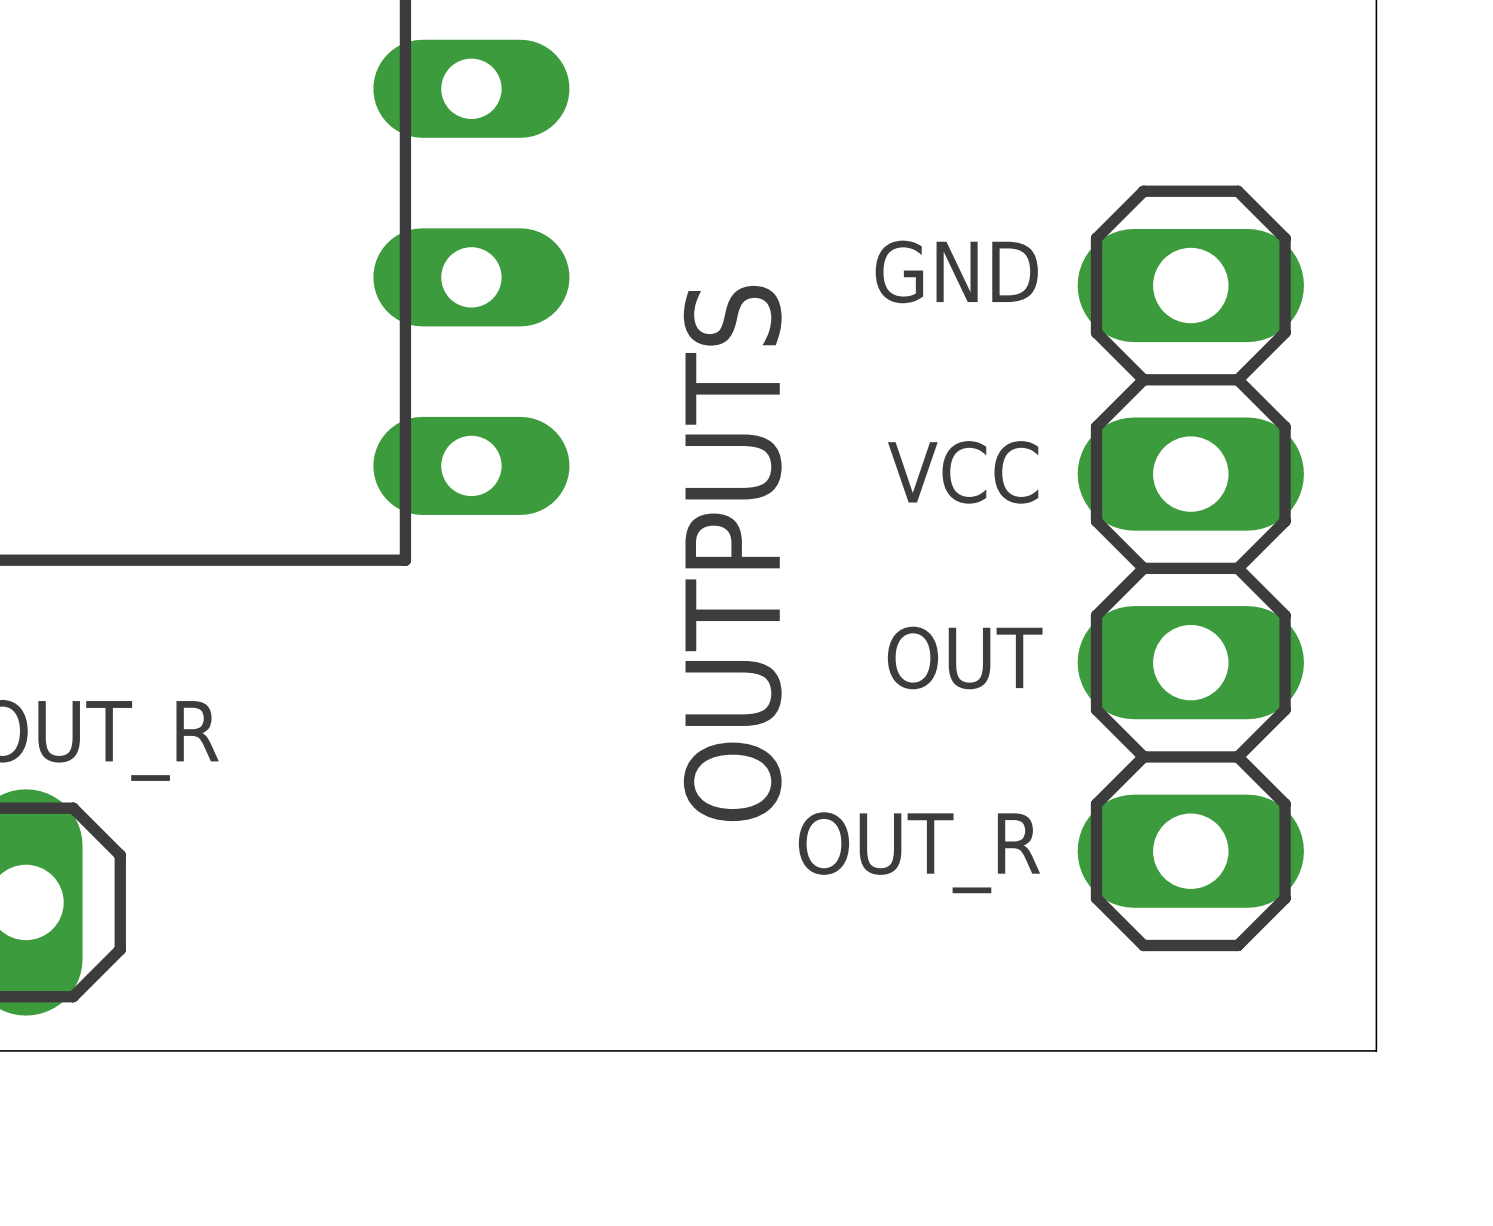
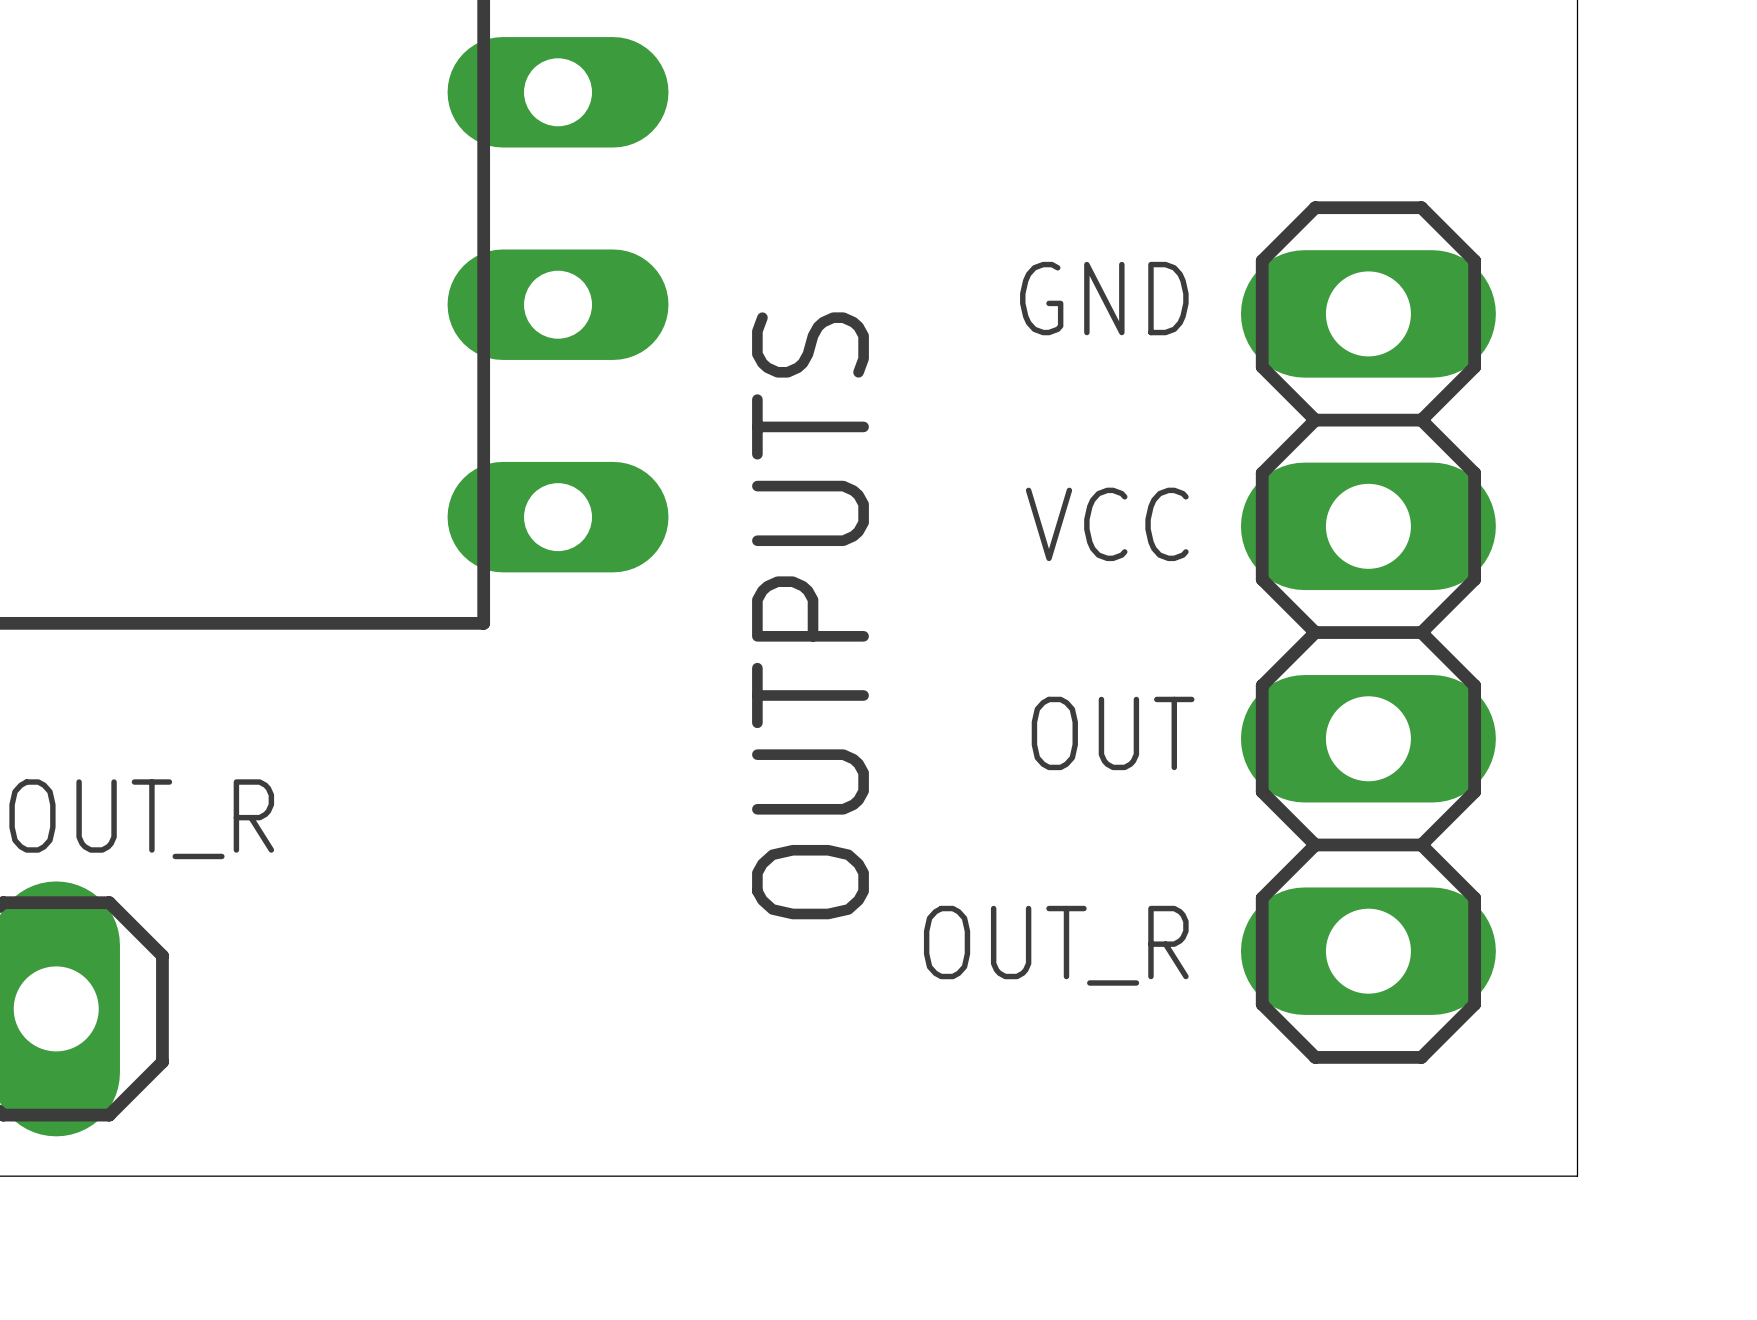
OUTPUTS name position: OUTPUTS (732, 553) -> OUTPUTS (810, 615)

